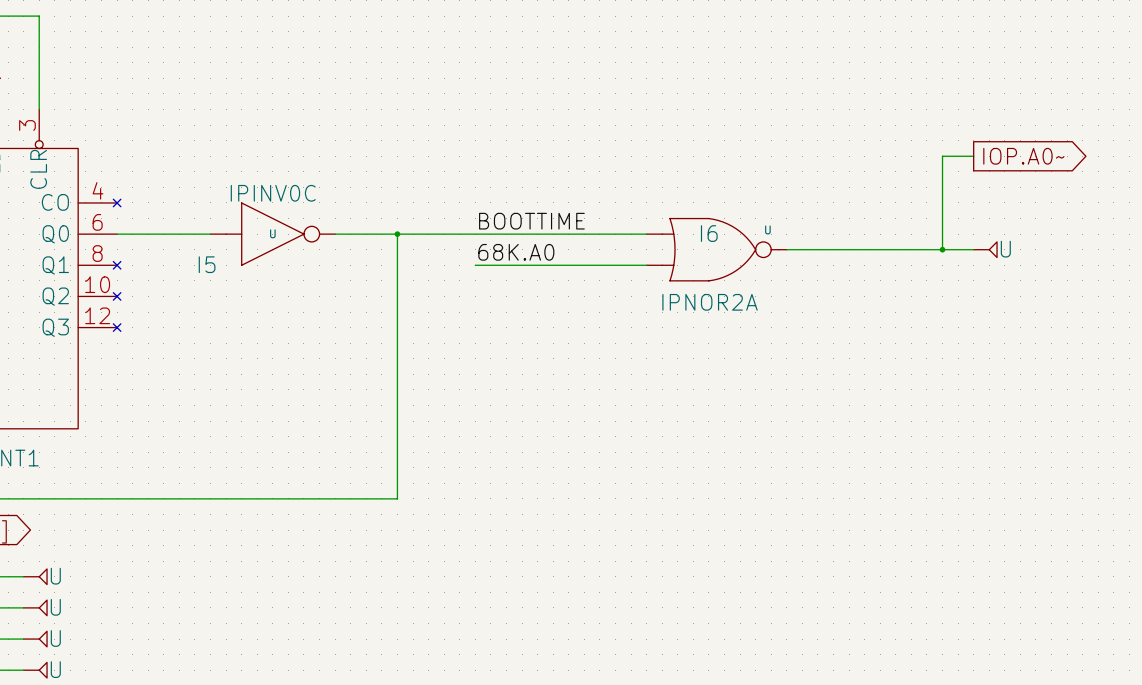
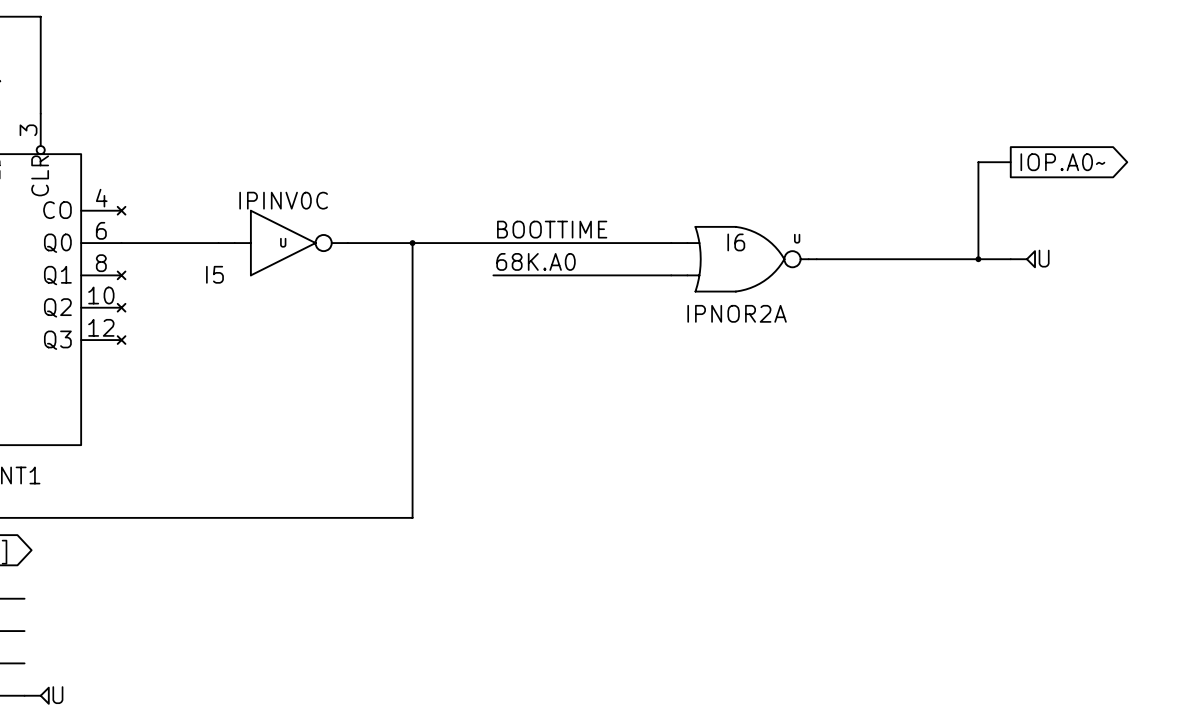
U: (35, 576) -> none
U: (35, 607) -> none
U: (35, 639) -> none

